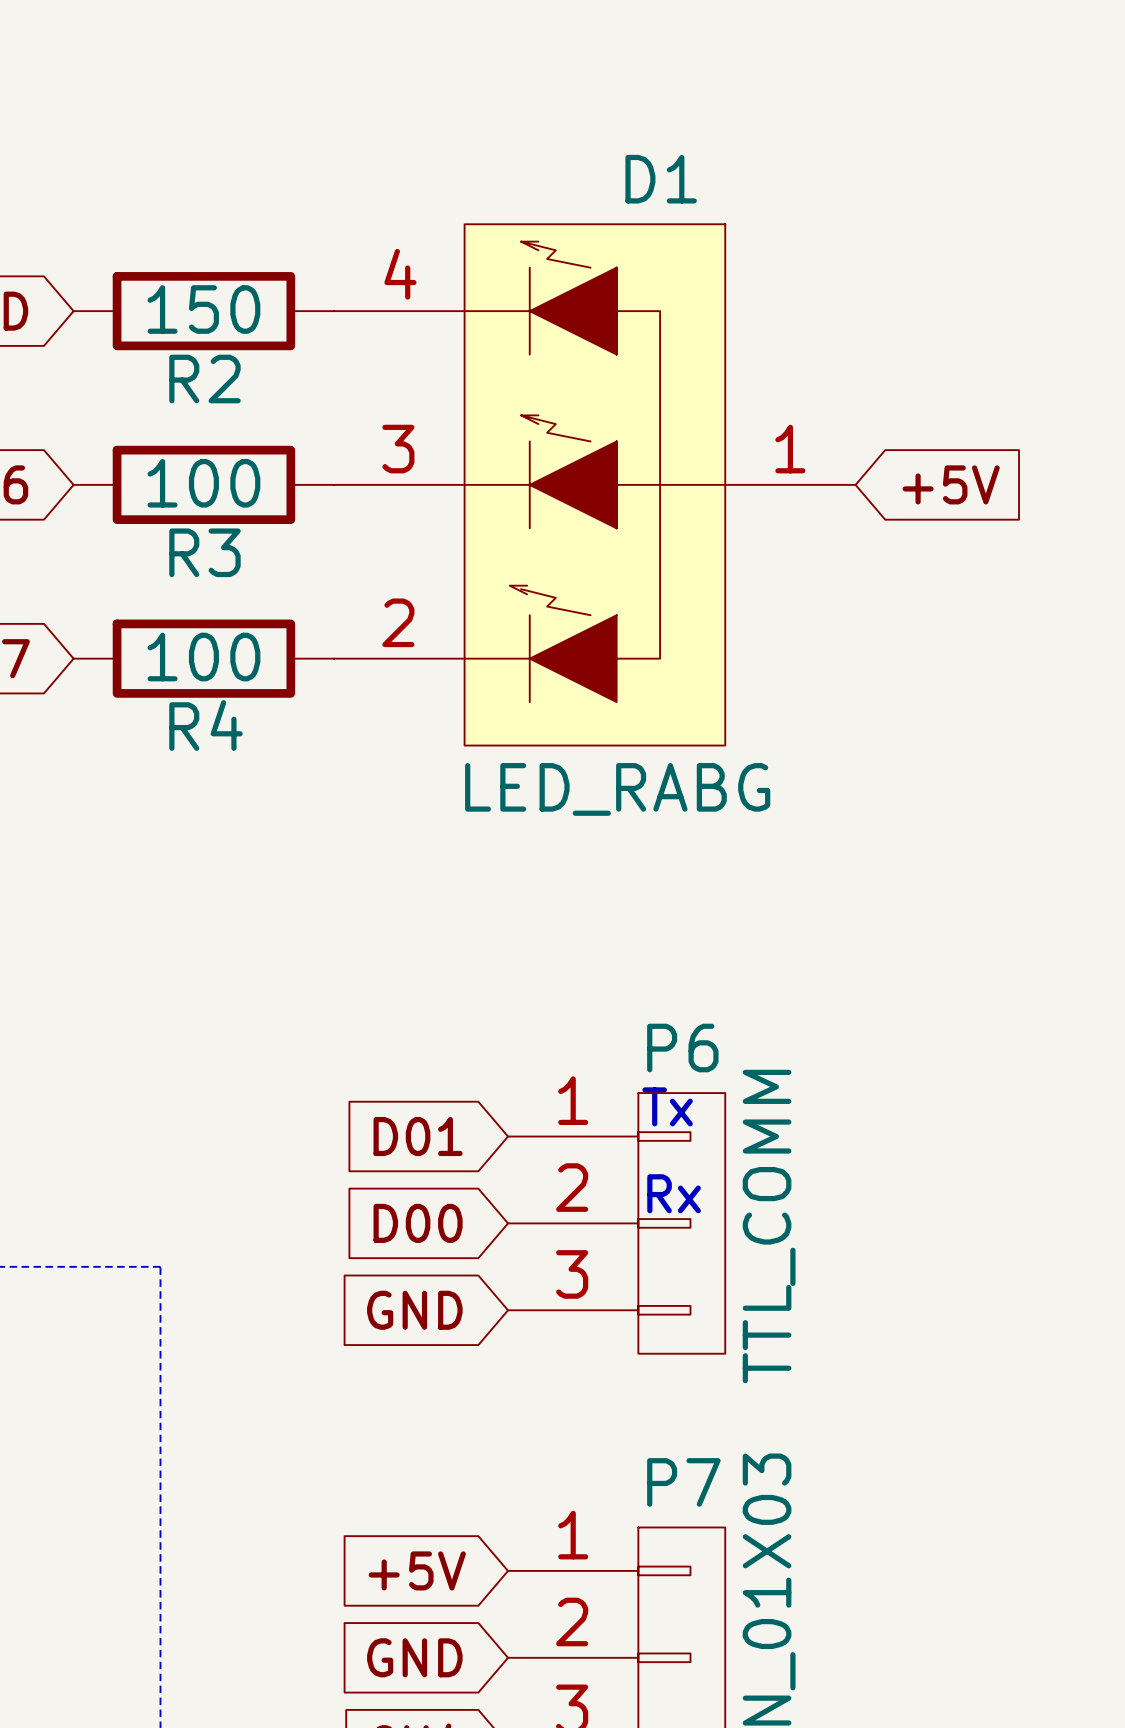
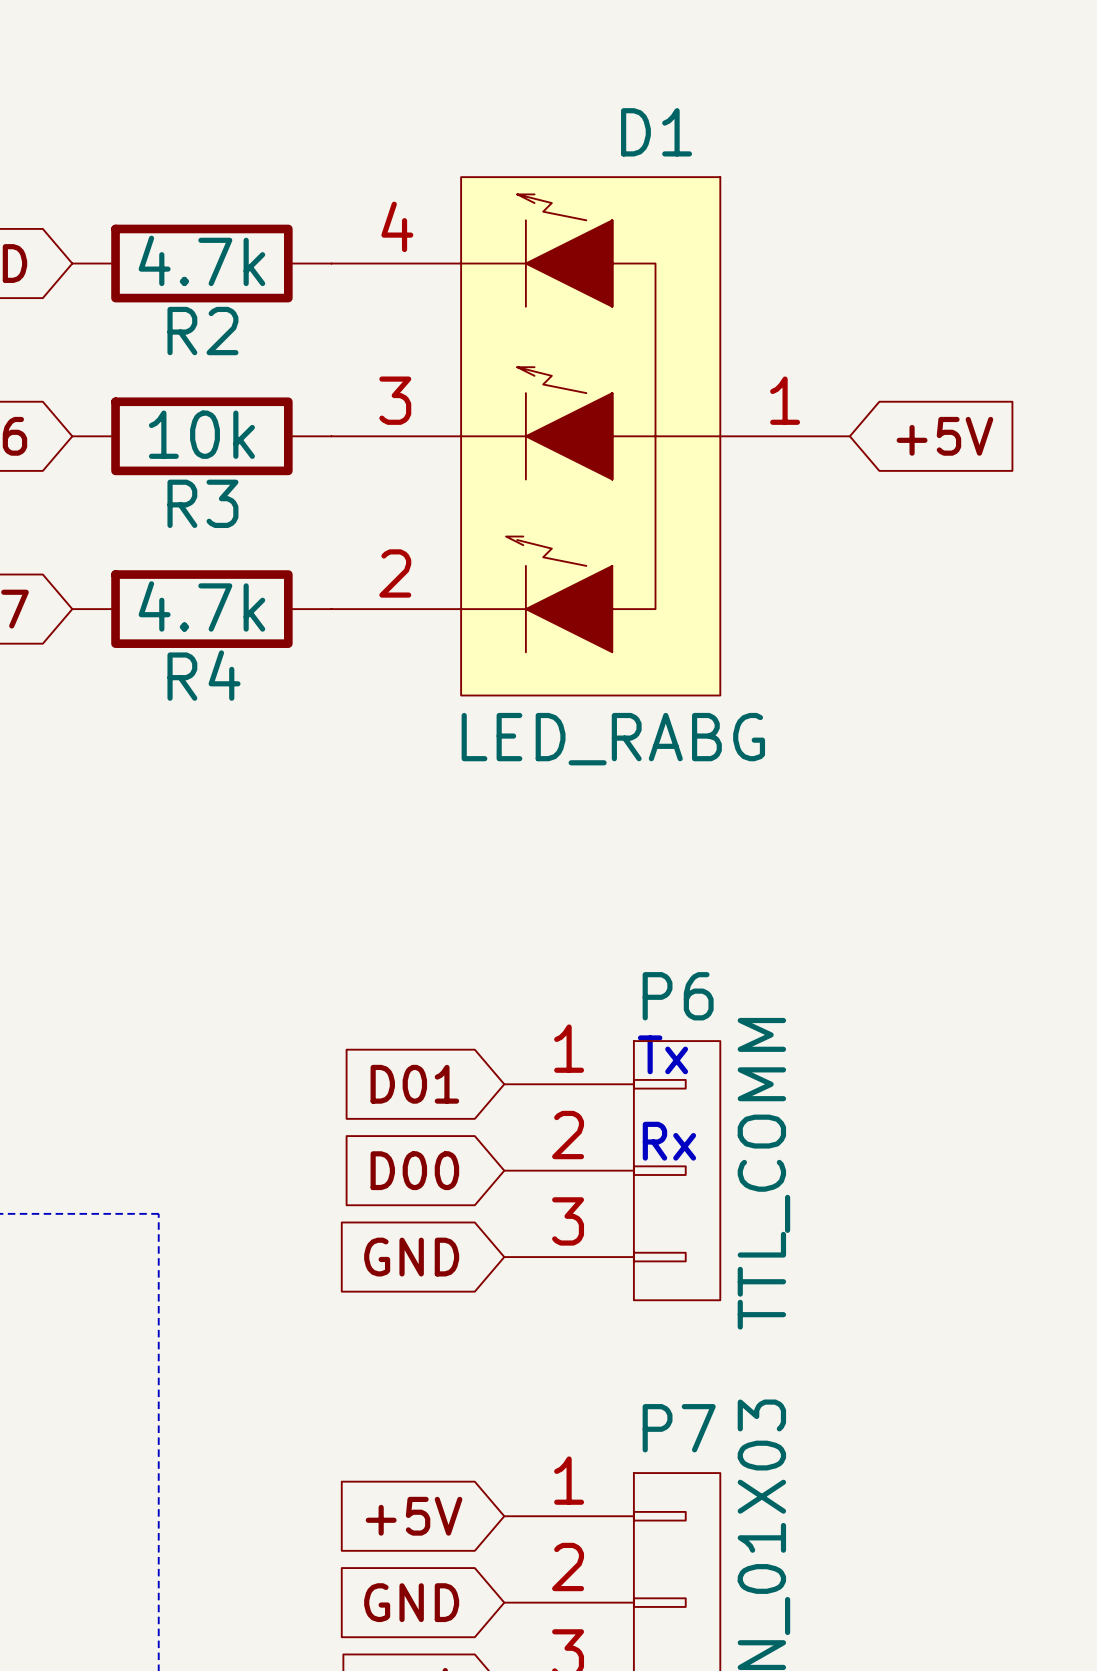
R2 value: 150 (203, 309) -> 4.7k (201, 260)
R3 value: 100 (203, 483) -> 10k (201, 434)
R4 value: 100 (203, 657) -> 4.7k (201, 606)

